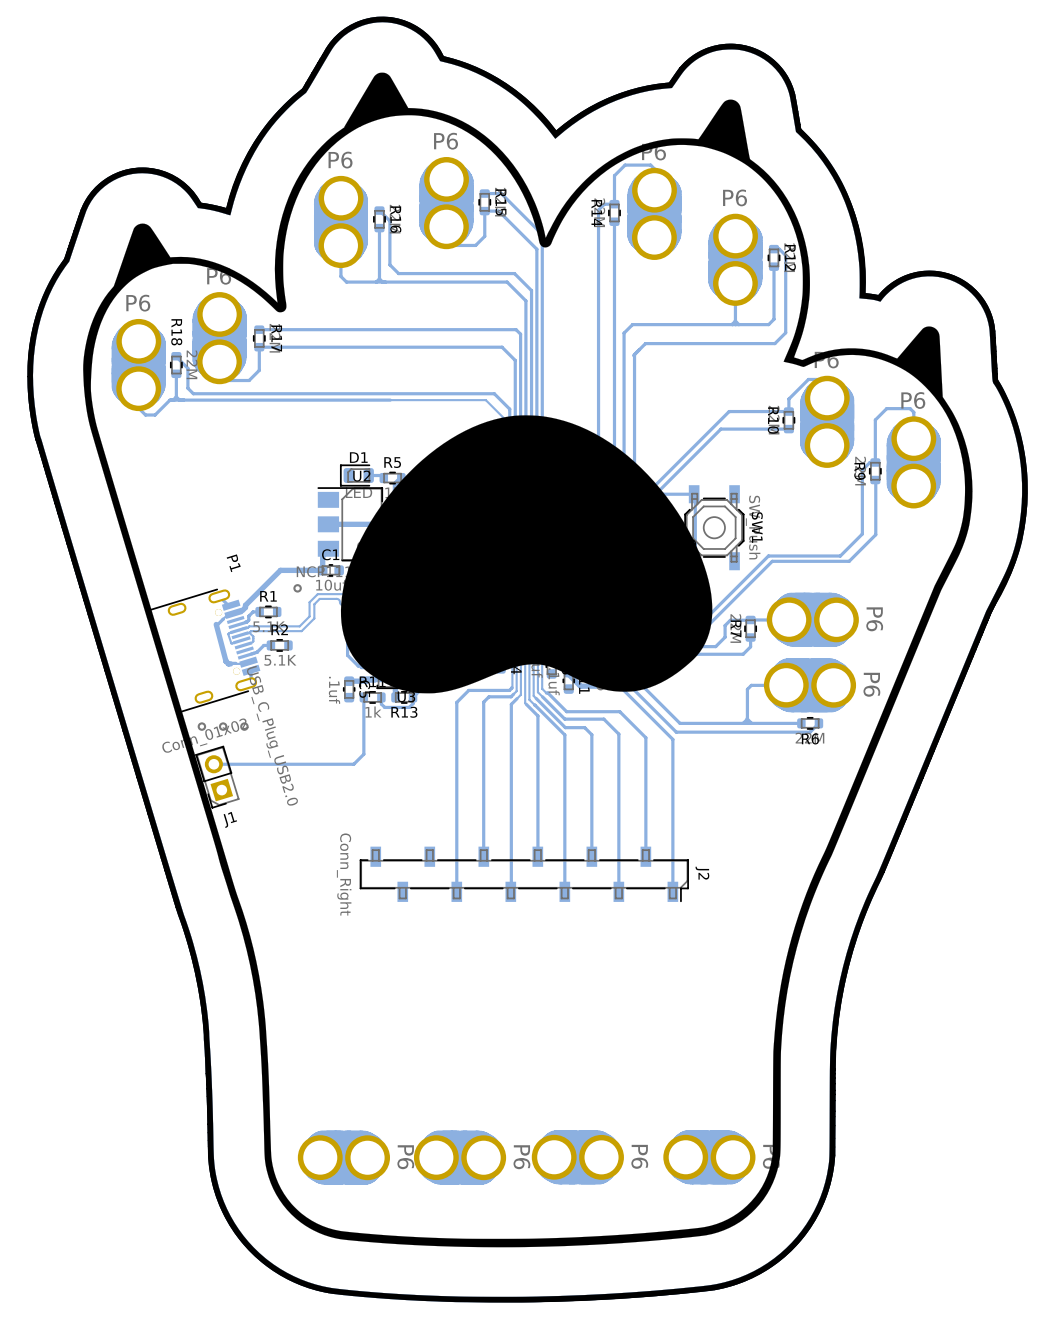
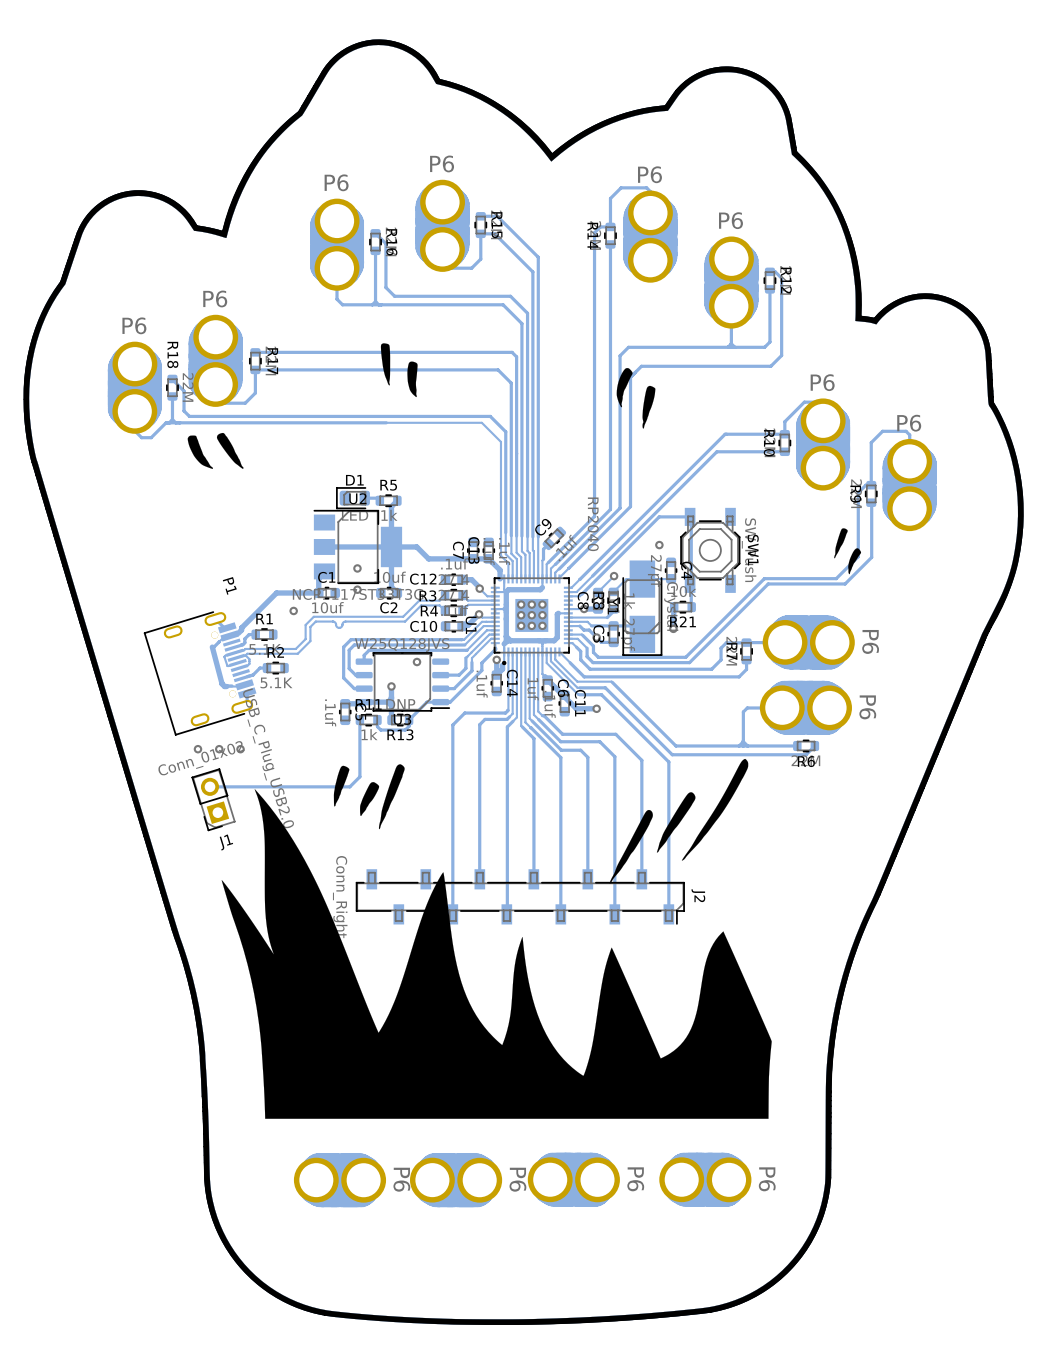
drawing shape: [27, 16, 1028, 1303] -> [23, 39, 1024, 1325]

